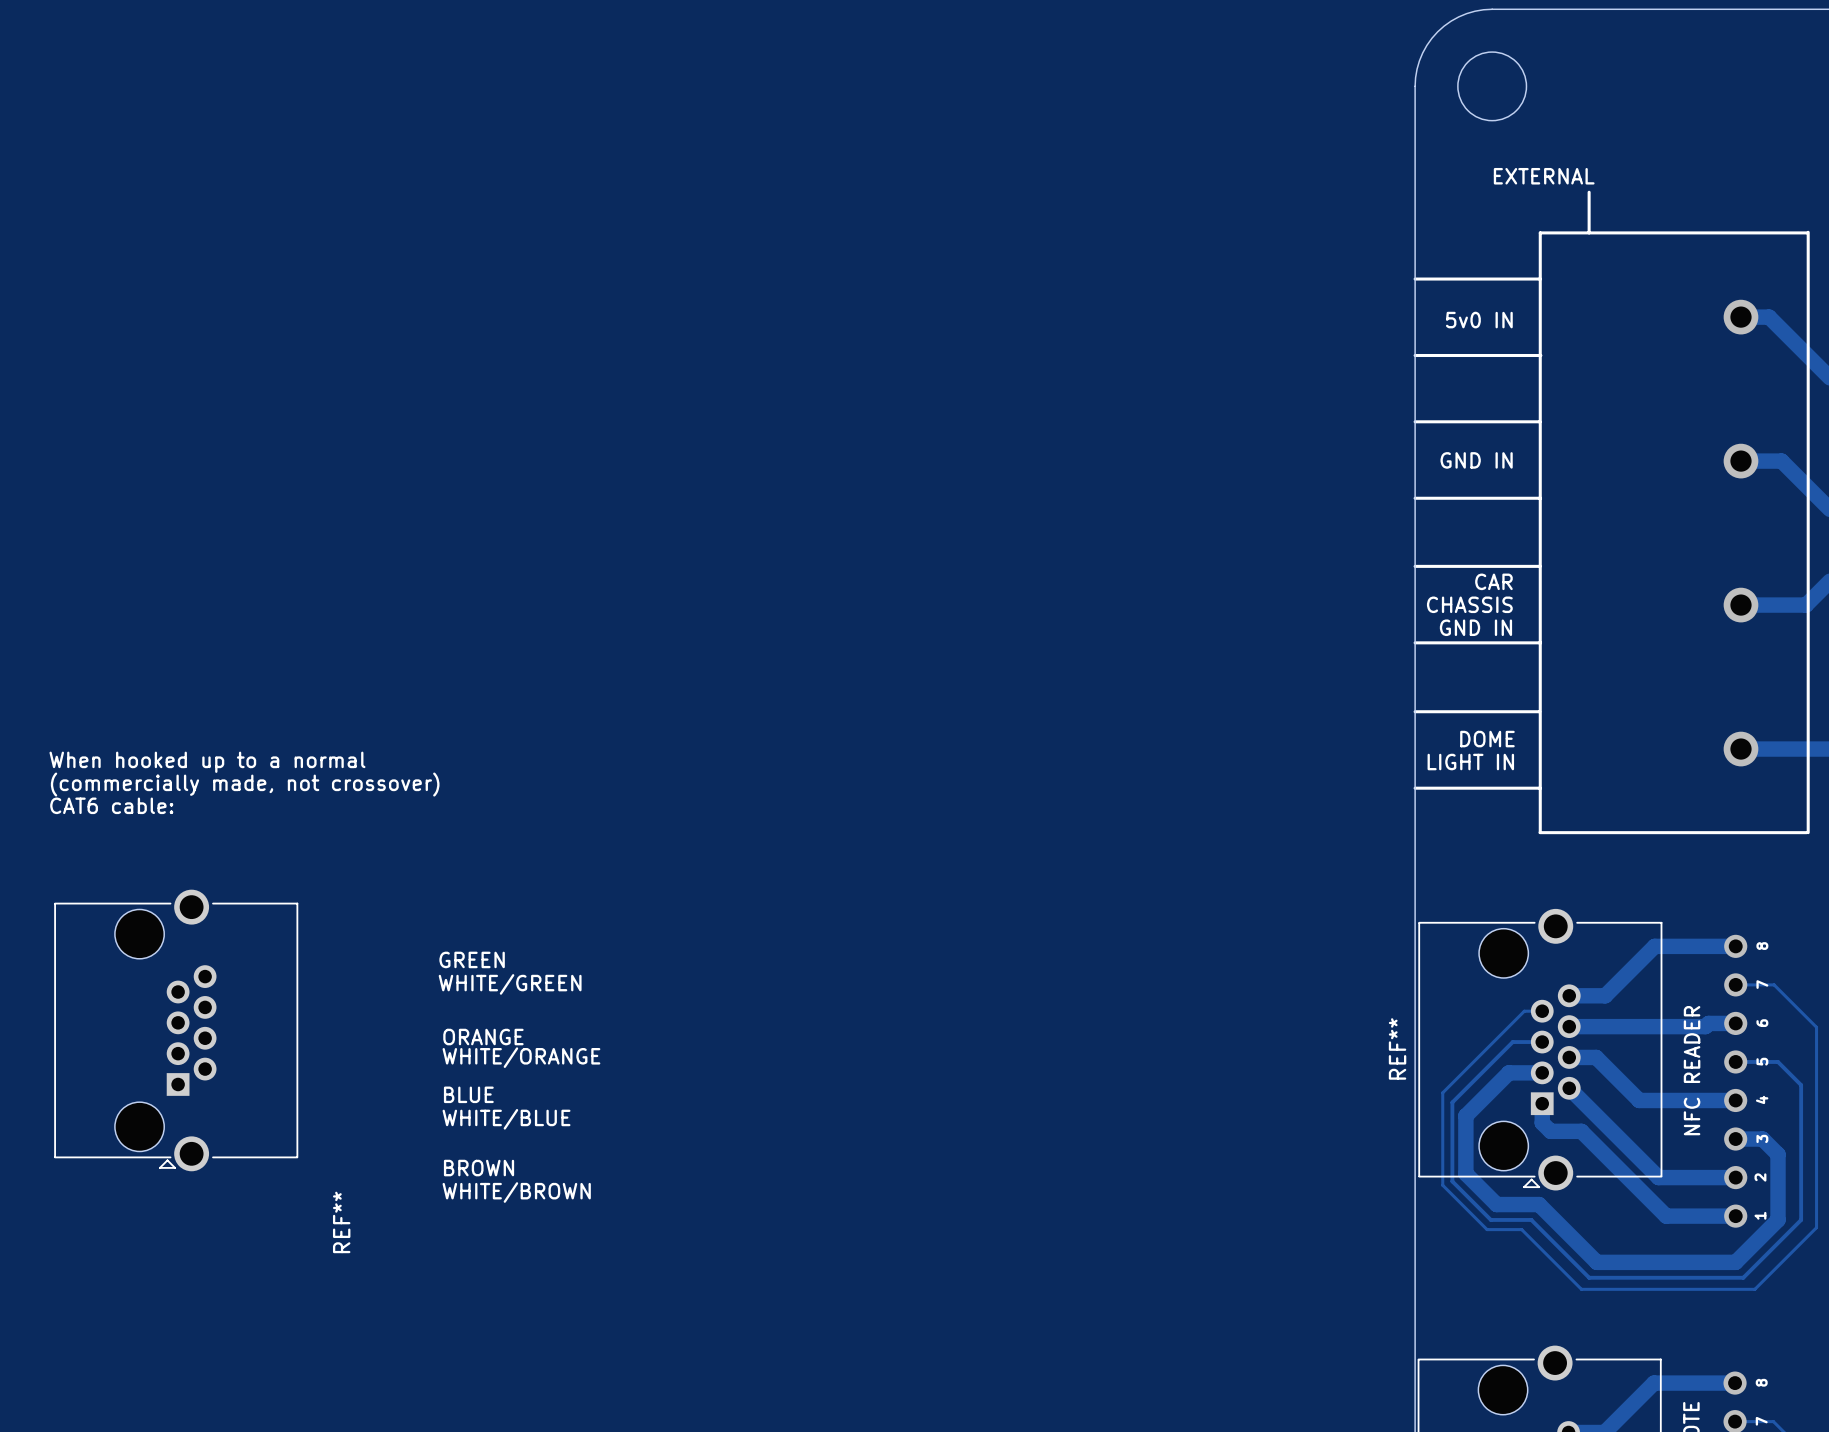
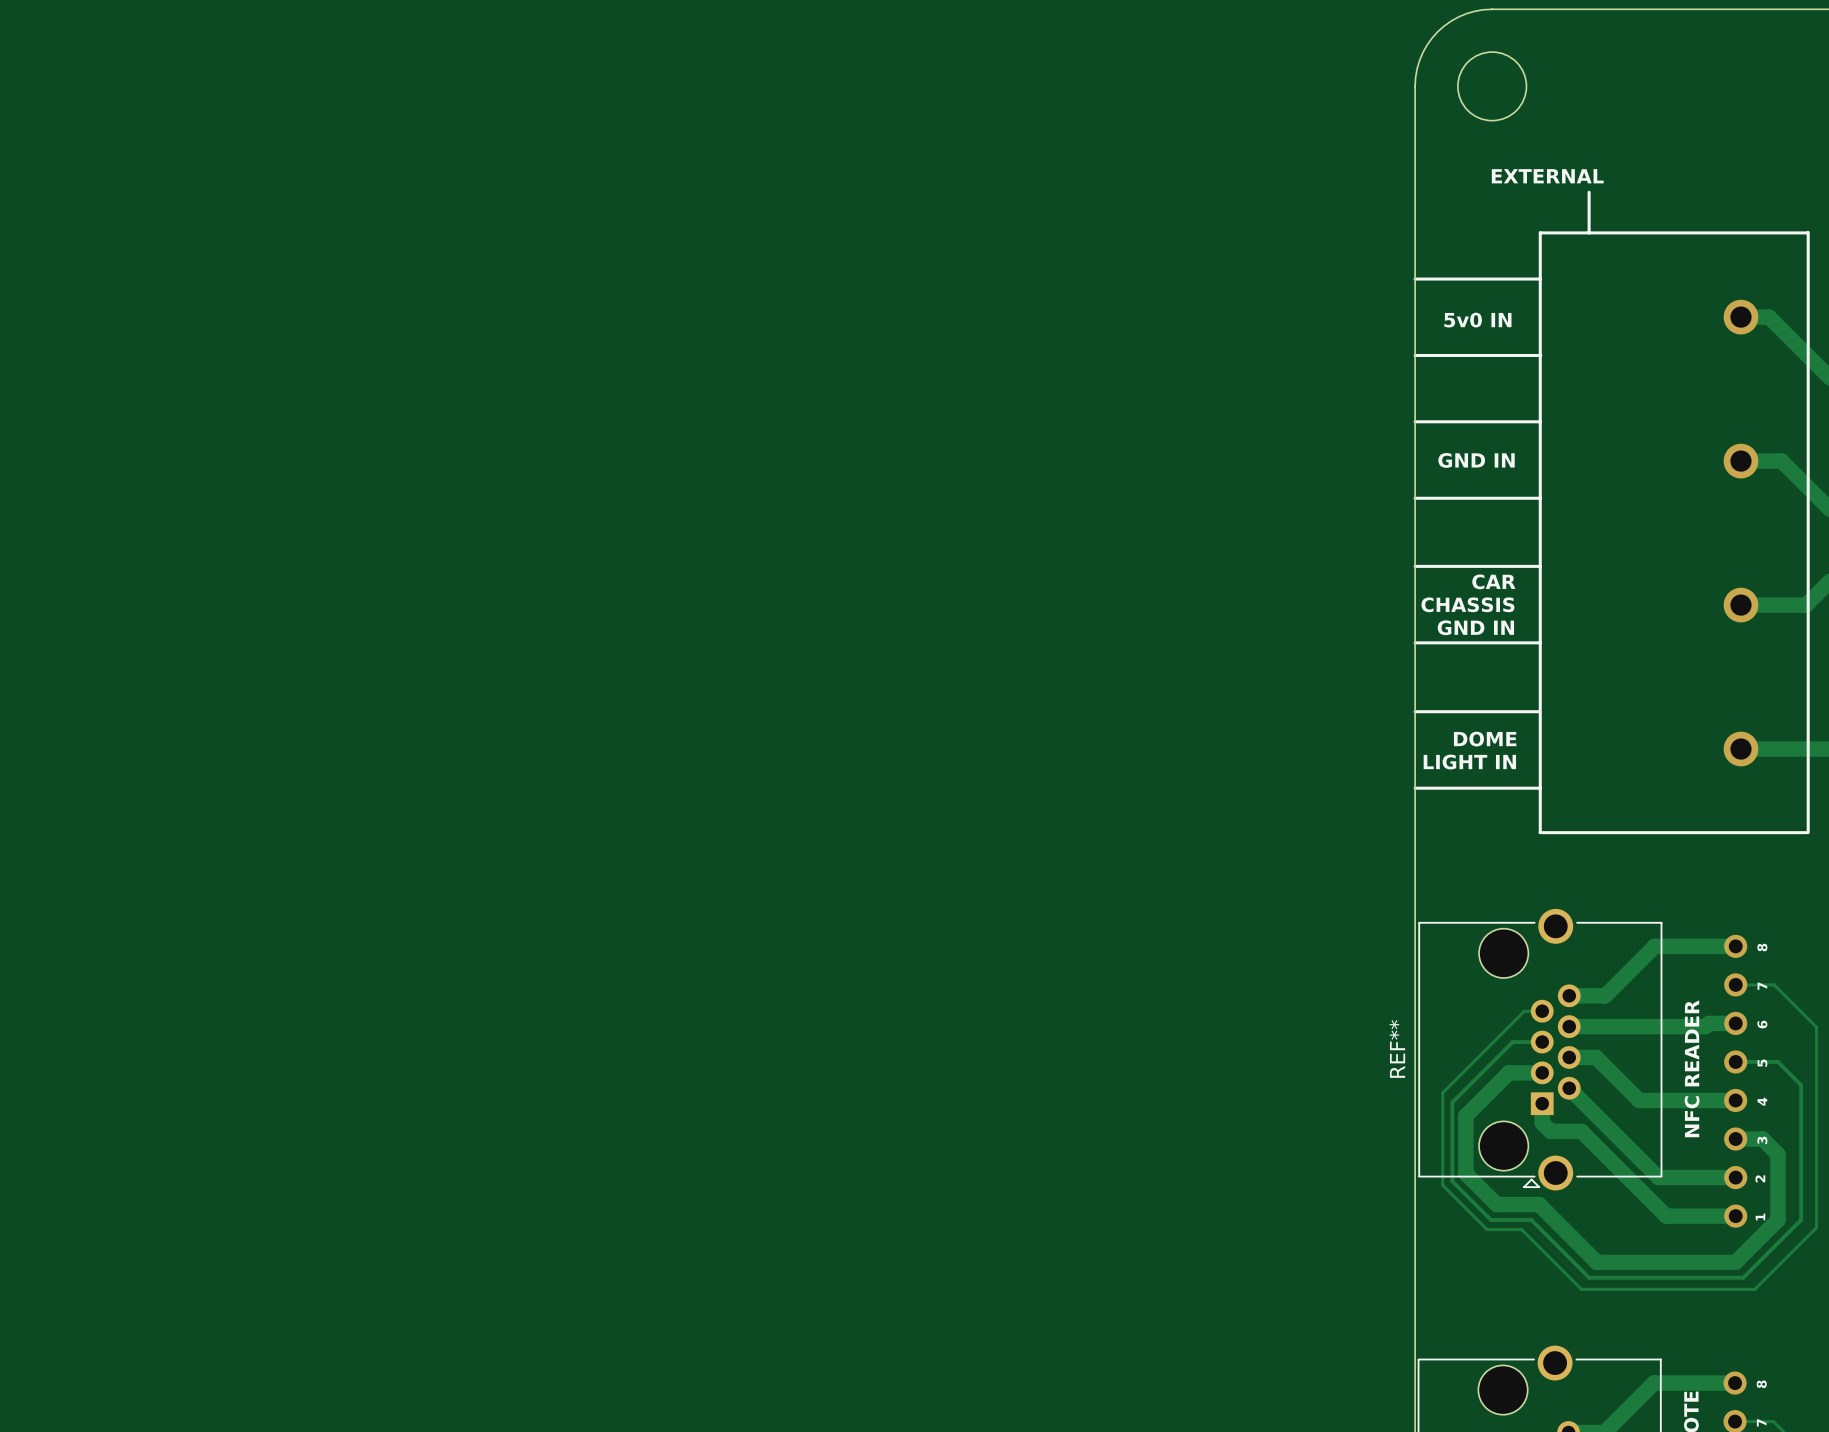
text: When hooked up to a normal (207, 762) -> none
text: (commercially made, not crossover) (245, 784) -> none
text: CAT6 cable: (111, 805) -> none
text: GREEN (472, 959) -> none
text: WHITE/GREEN (510, 984) -> none
REF**: (176, 1030) -> none
text: ORANGE (483, 1037) -> none
text: WHITE/ORANGE (521, 1057) -> none
text: BLUE (468, 1094) -> none
text: WHITE/BLUE (506, 1119) -> none
text: BROWN (479, 1168) -> none
text: WHITE/BROWN (516, 1192) -> none

